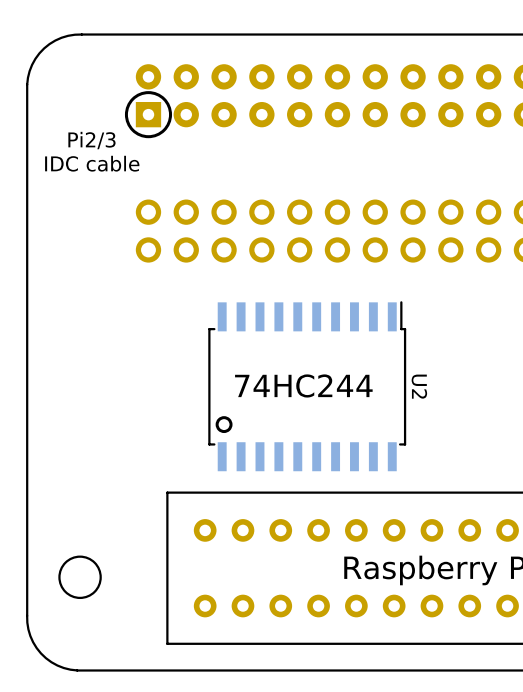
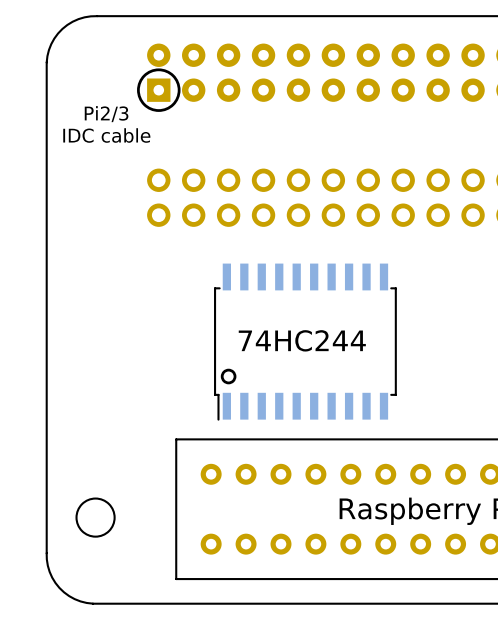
U2: (307, 386) -> none
part: none -> (305, 342)

